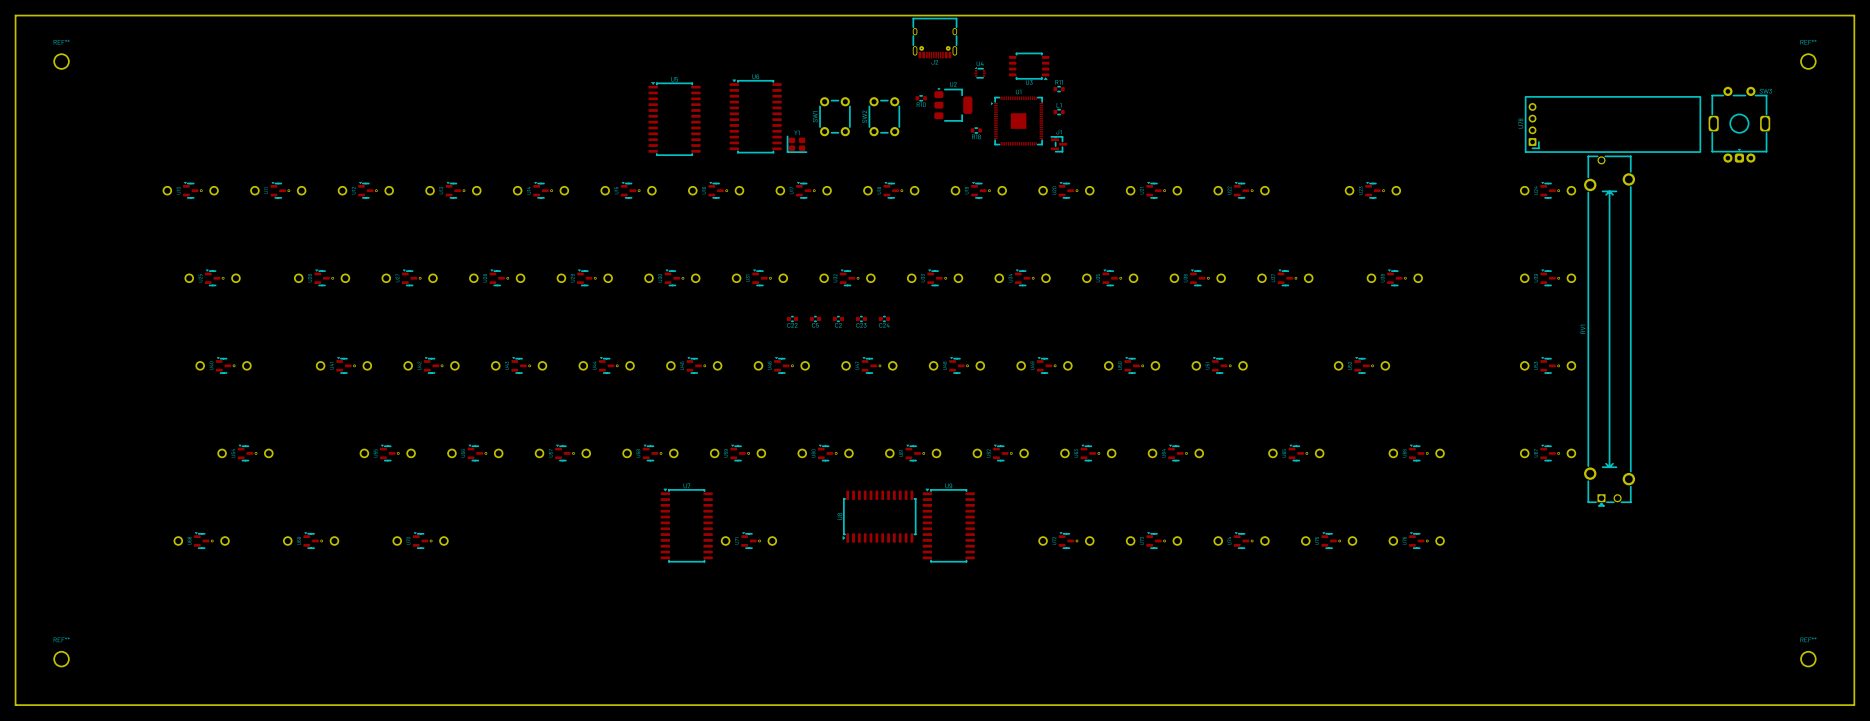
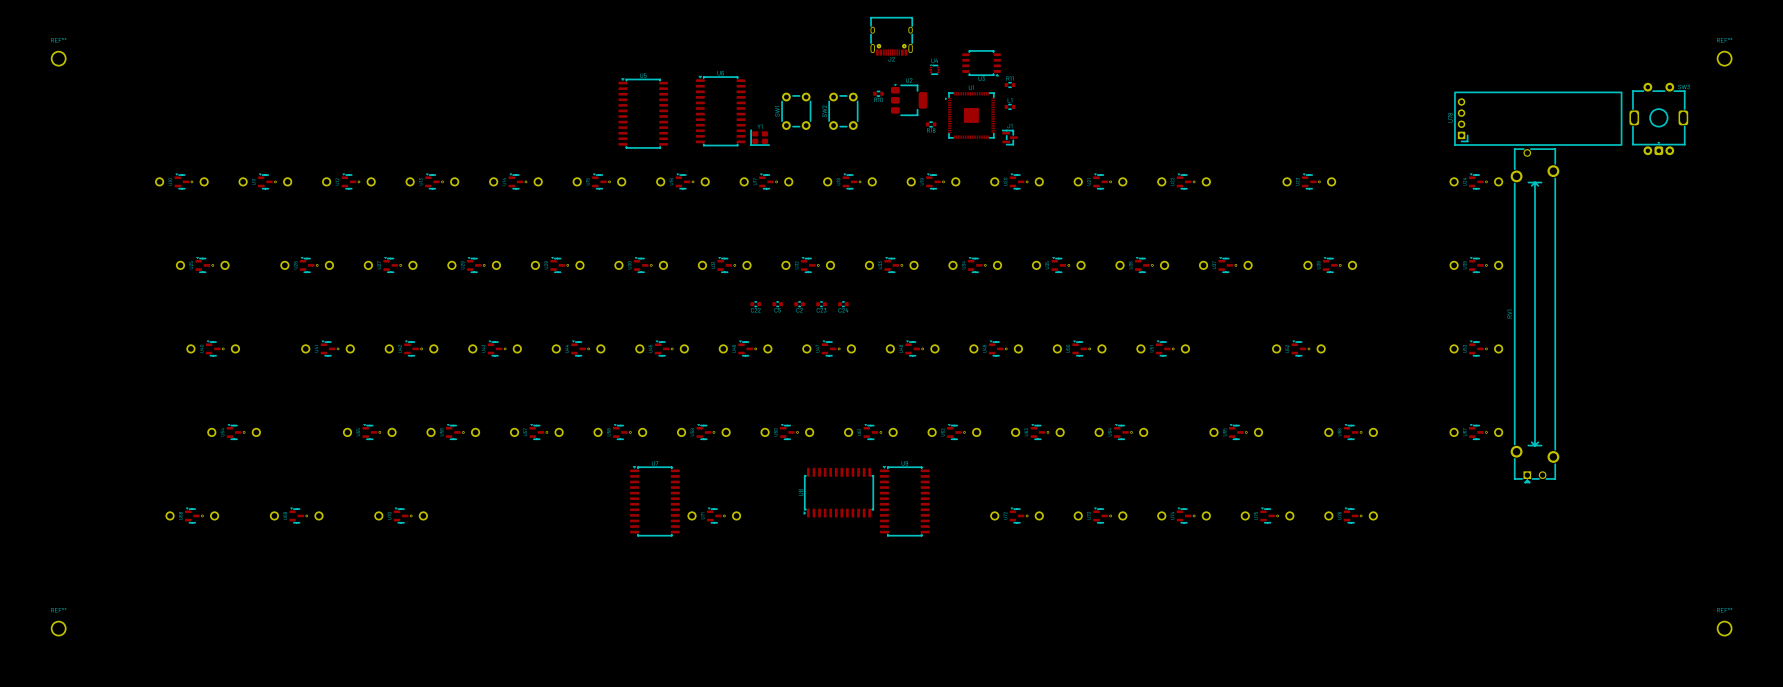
board edge: (15, 15) (1854, 15) (1854, 705) (15, 705) (15, 15) -> none

